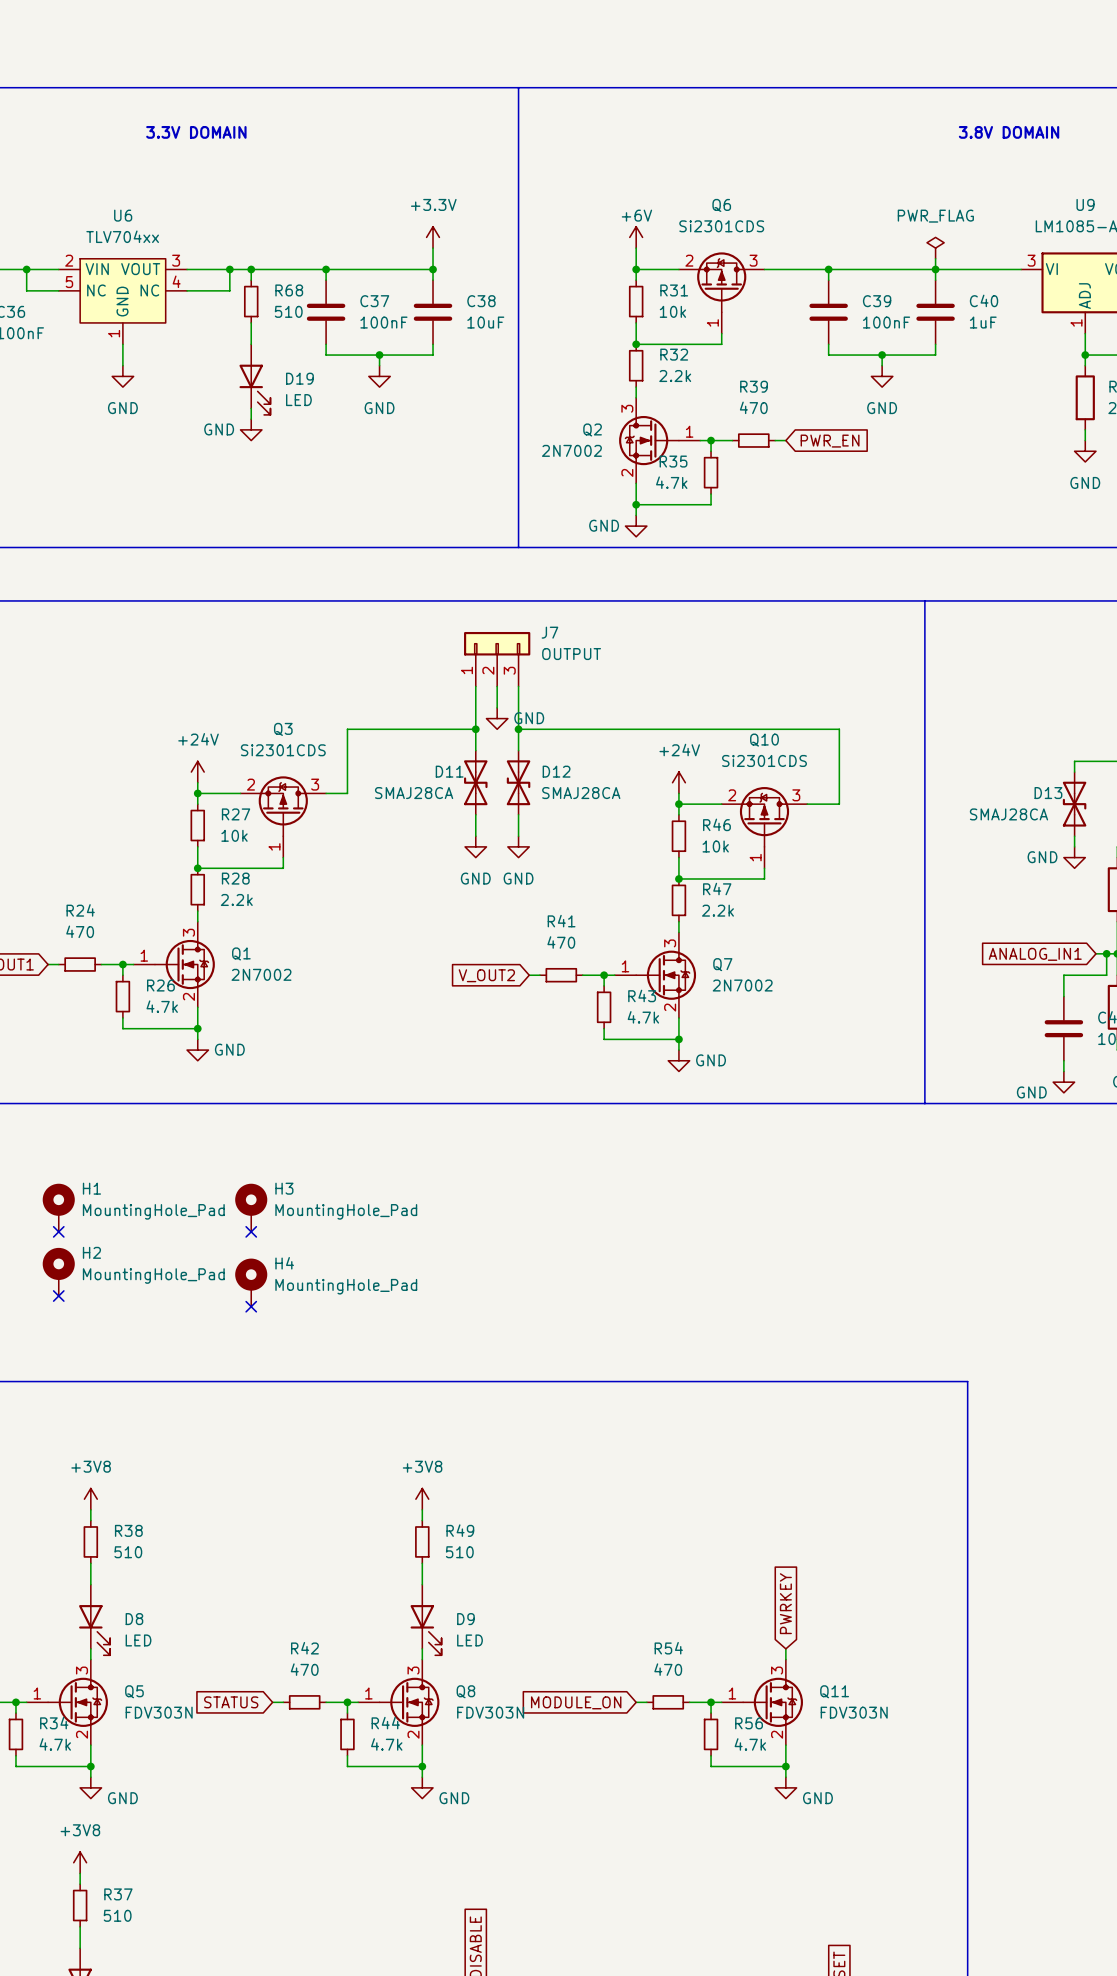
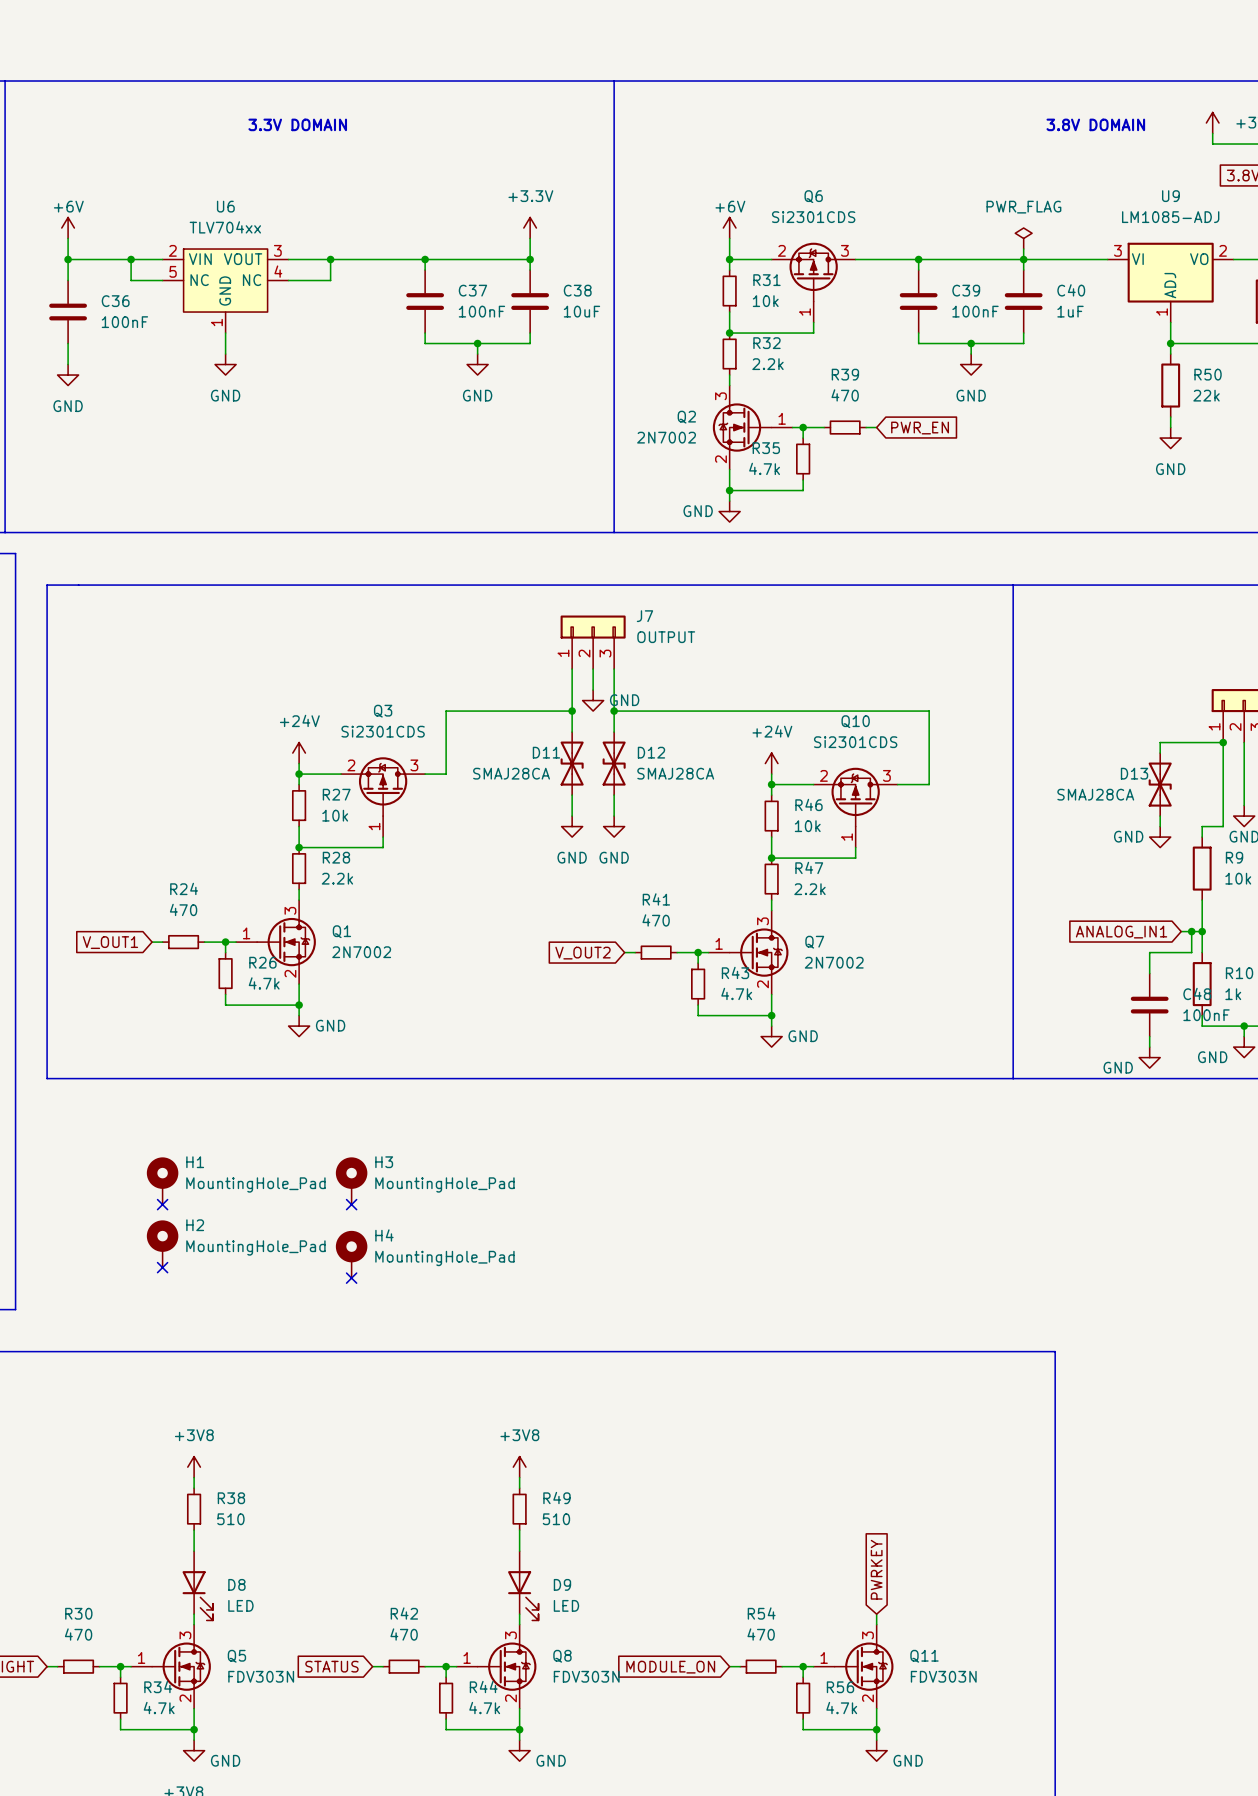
wire: (251, 269) (251, 280) -> none
junction: (251, 269) -> none
R68: 510 (251, 301) -> none
wire: (251, 322) (251, 344) -> none
D19: LED (254, 379) -> none
wire: (251, 408) (251, 419) -> none
power symbol: GND (251, 429) -> none

